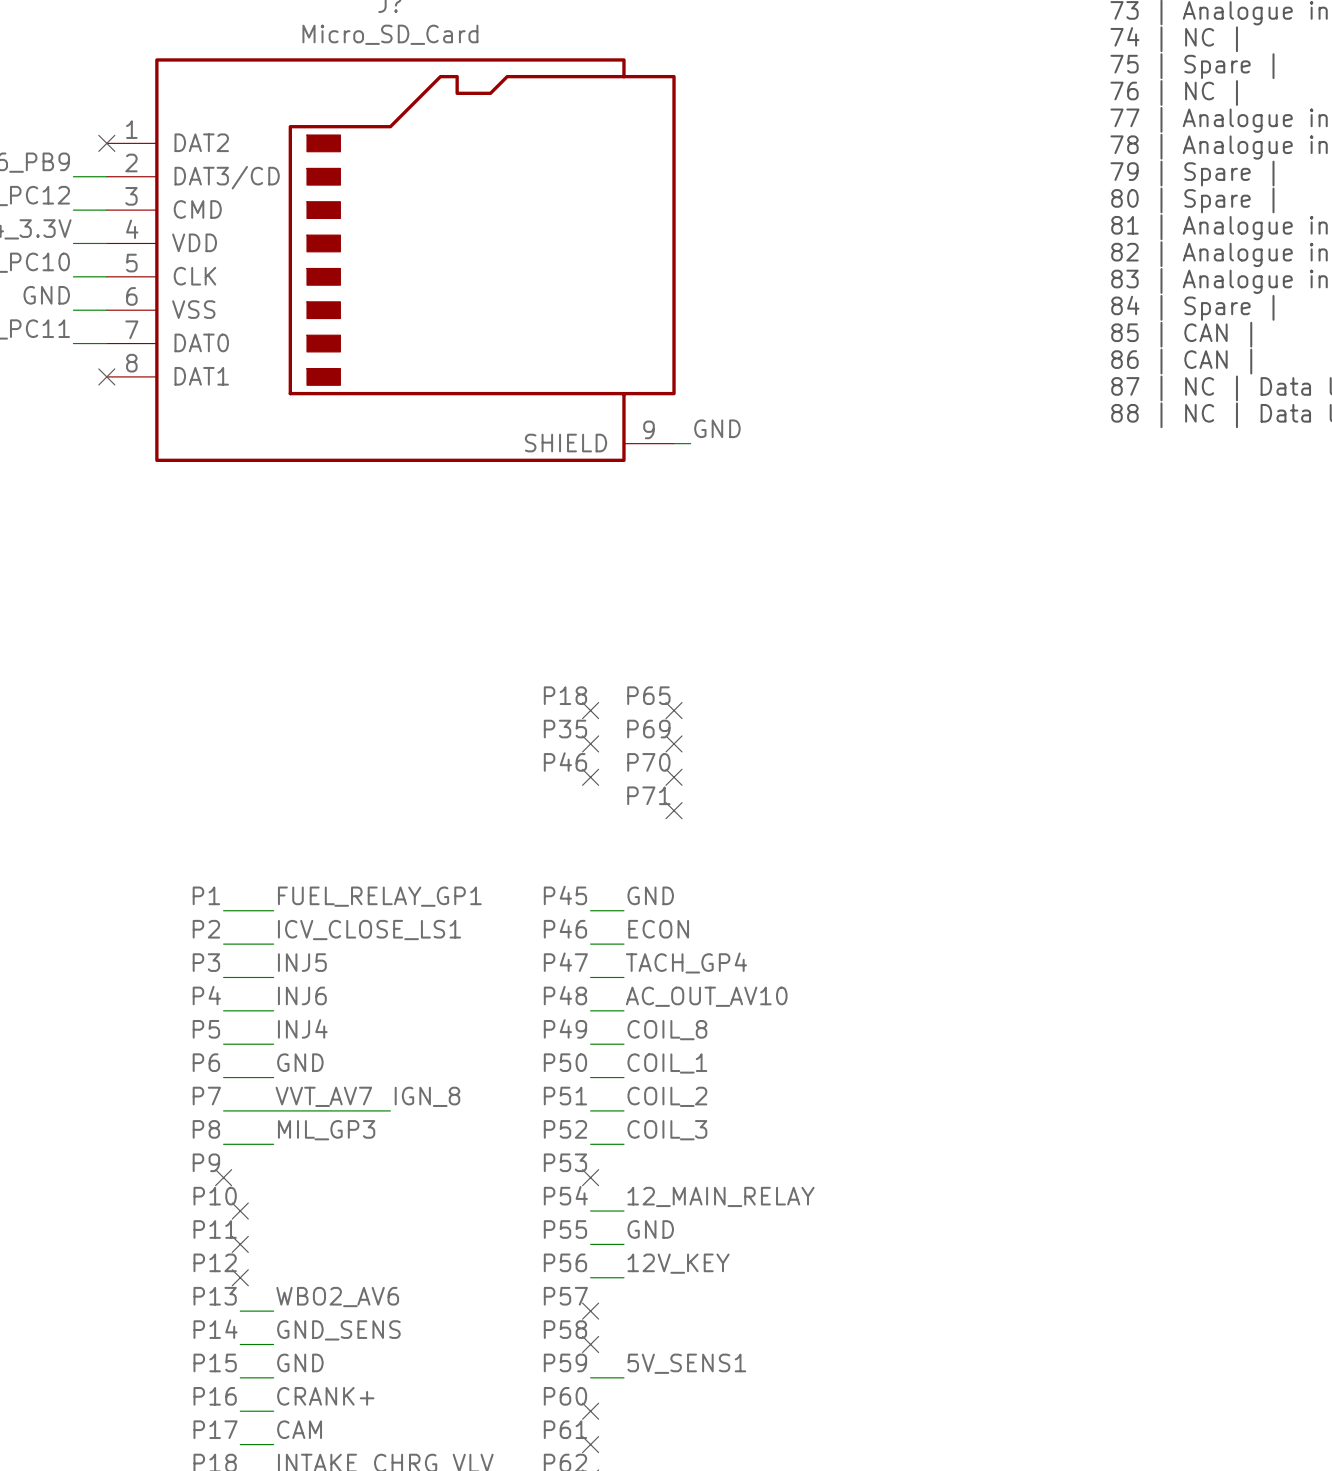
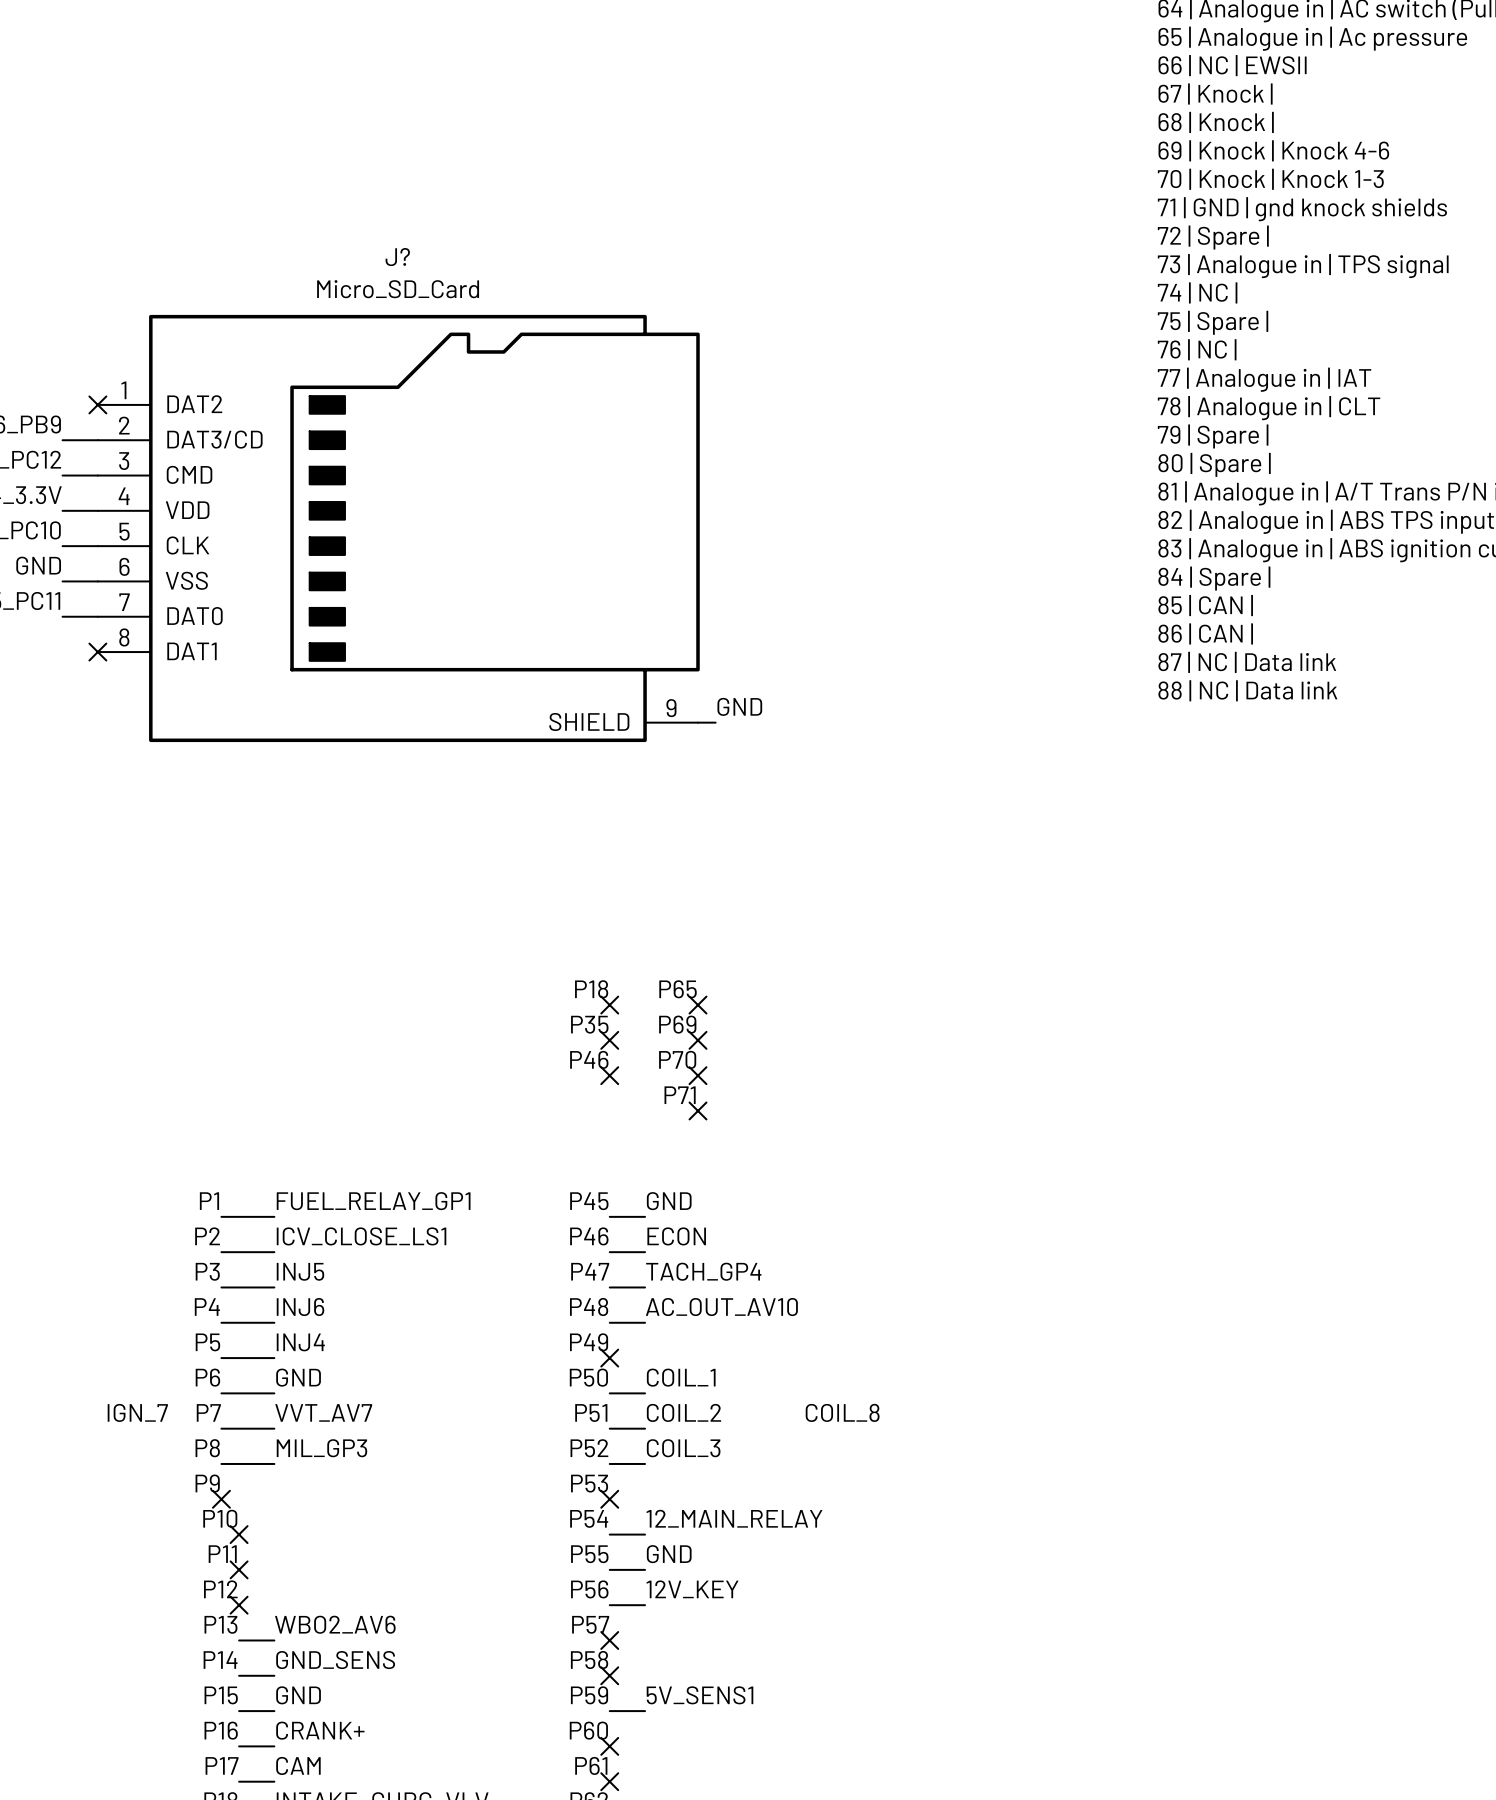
label position: COIL_8 (667, 1030) -> COIL_8 (842, 1412)
wire: (590, 1044) (623, 1044) -> none
no-connect mark: none -> (609, 1358)
label: none -> IGN_7 (137, 1412)
label: IGN_8 (427, 1096) -> none
wire: (273, 1110) (390, 1110) -> none

